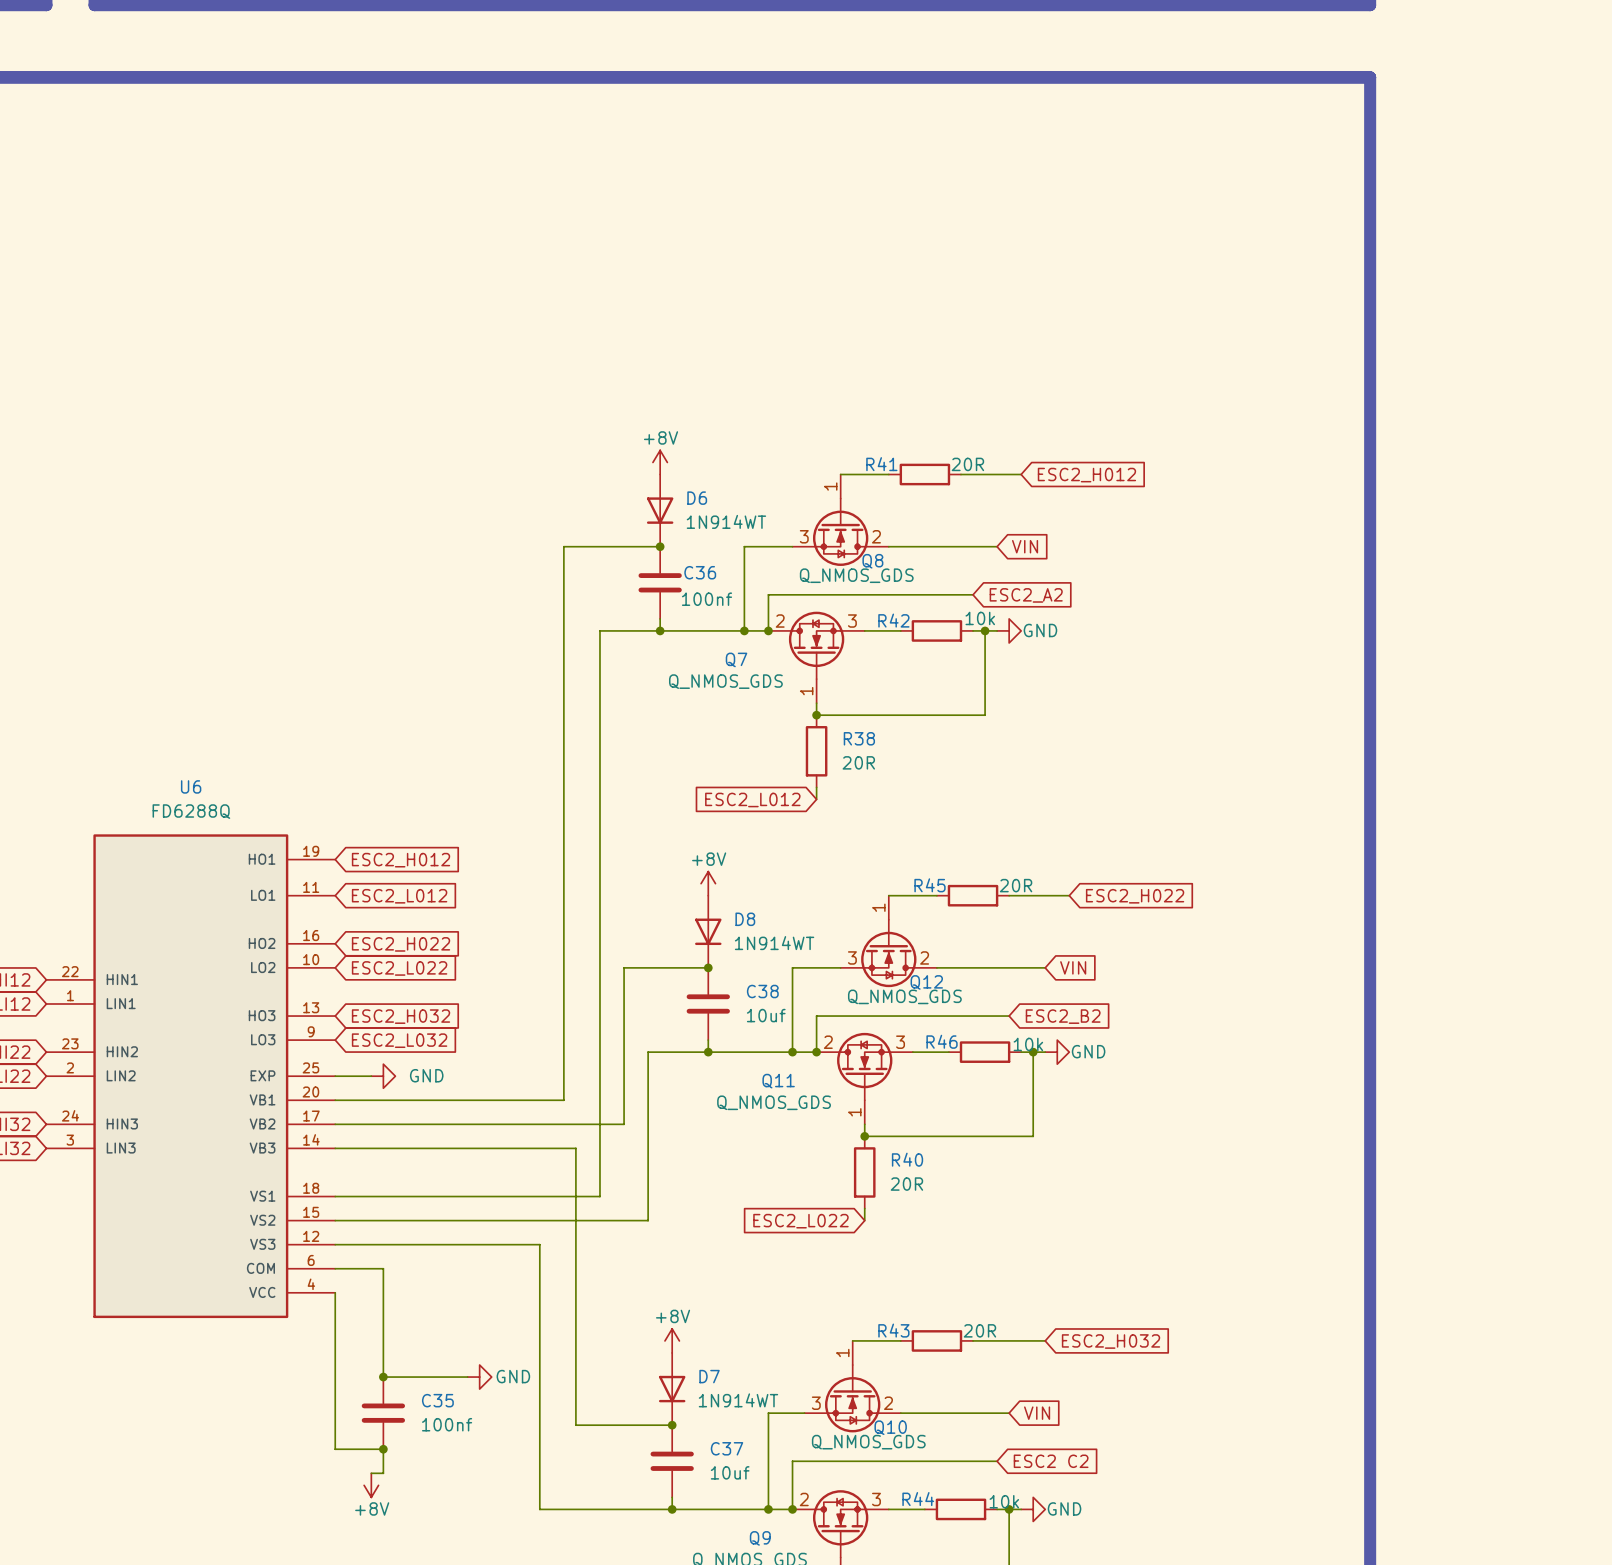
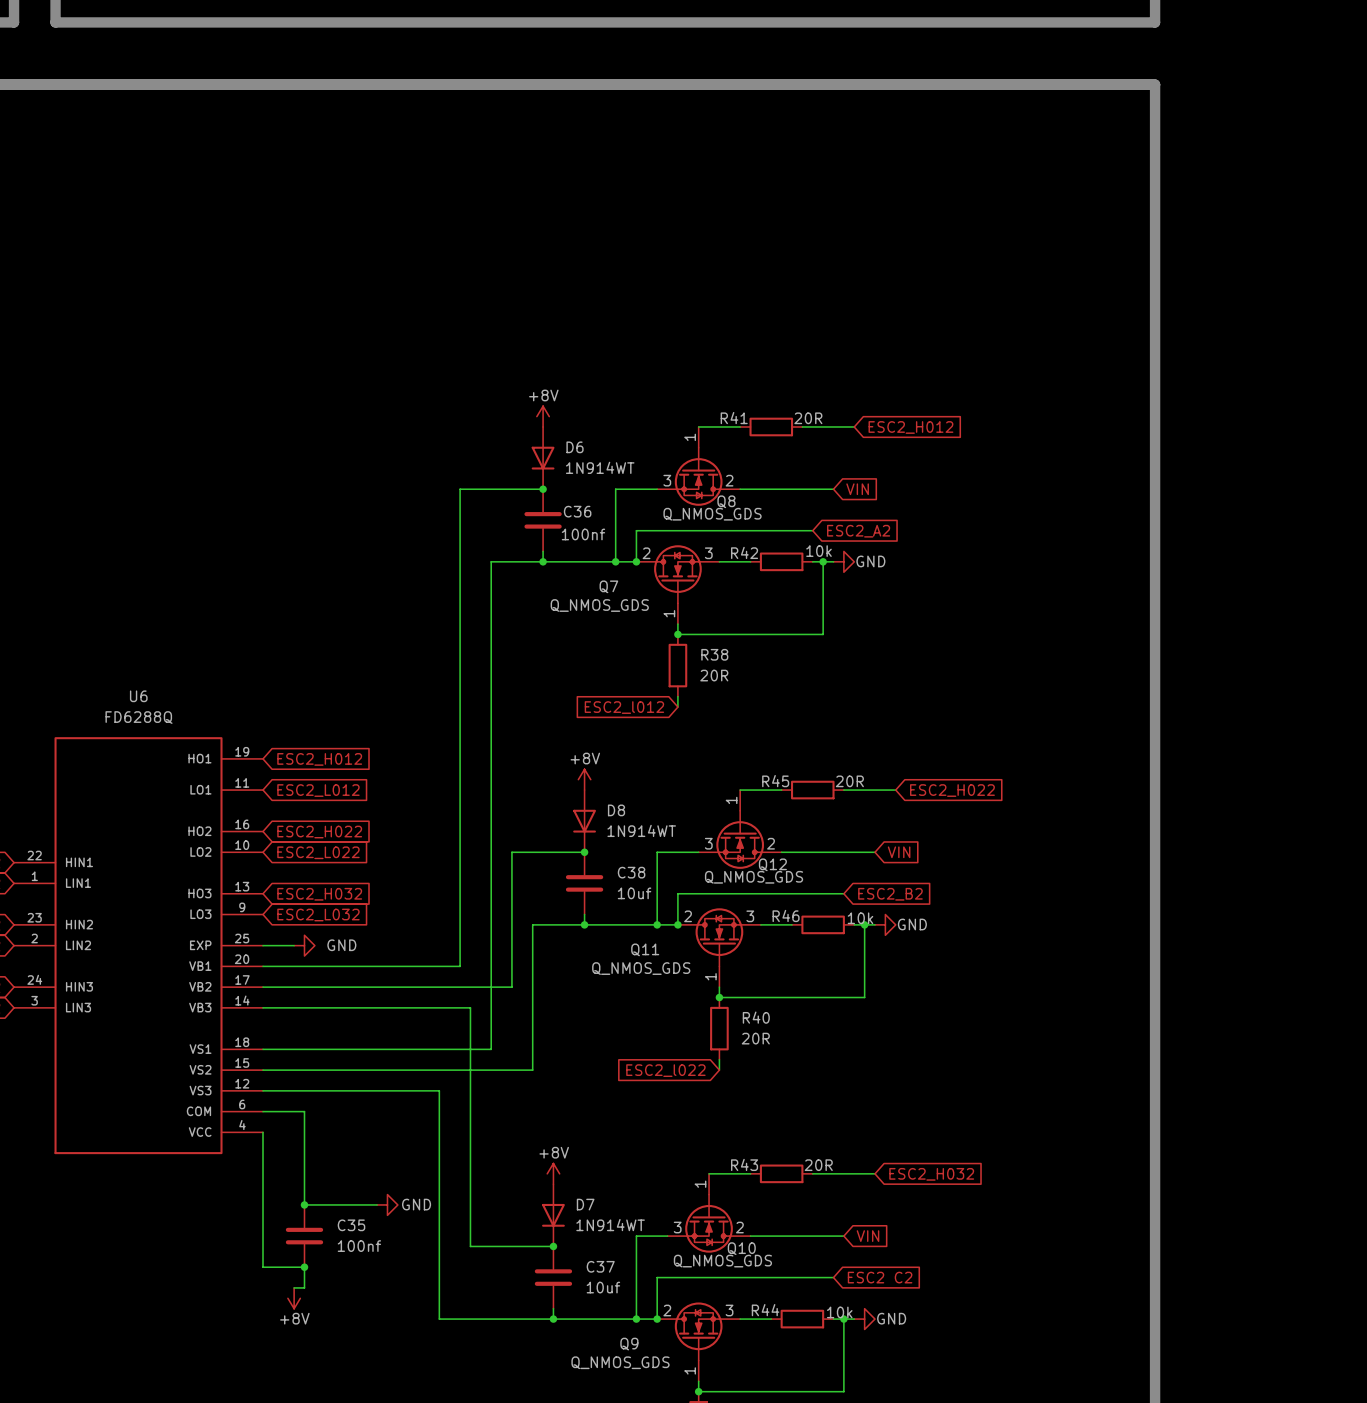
global label: ESC2_L012 (752, 799) -> ESC2_l012 (624, 707)
global label: ESC2_L022 (800, 1221) -> ESC2_l022 (665, 1070)

